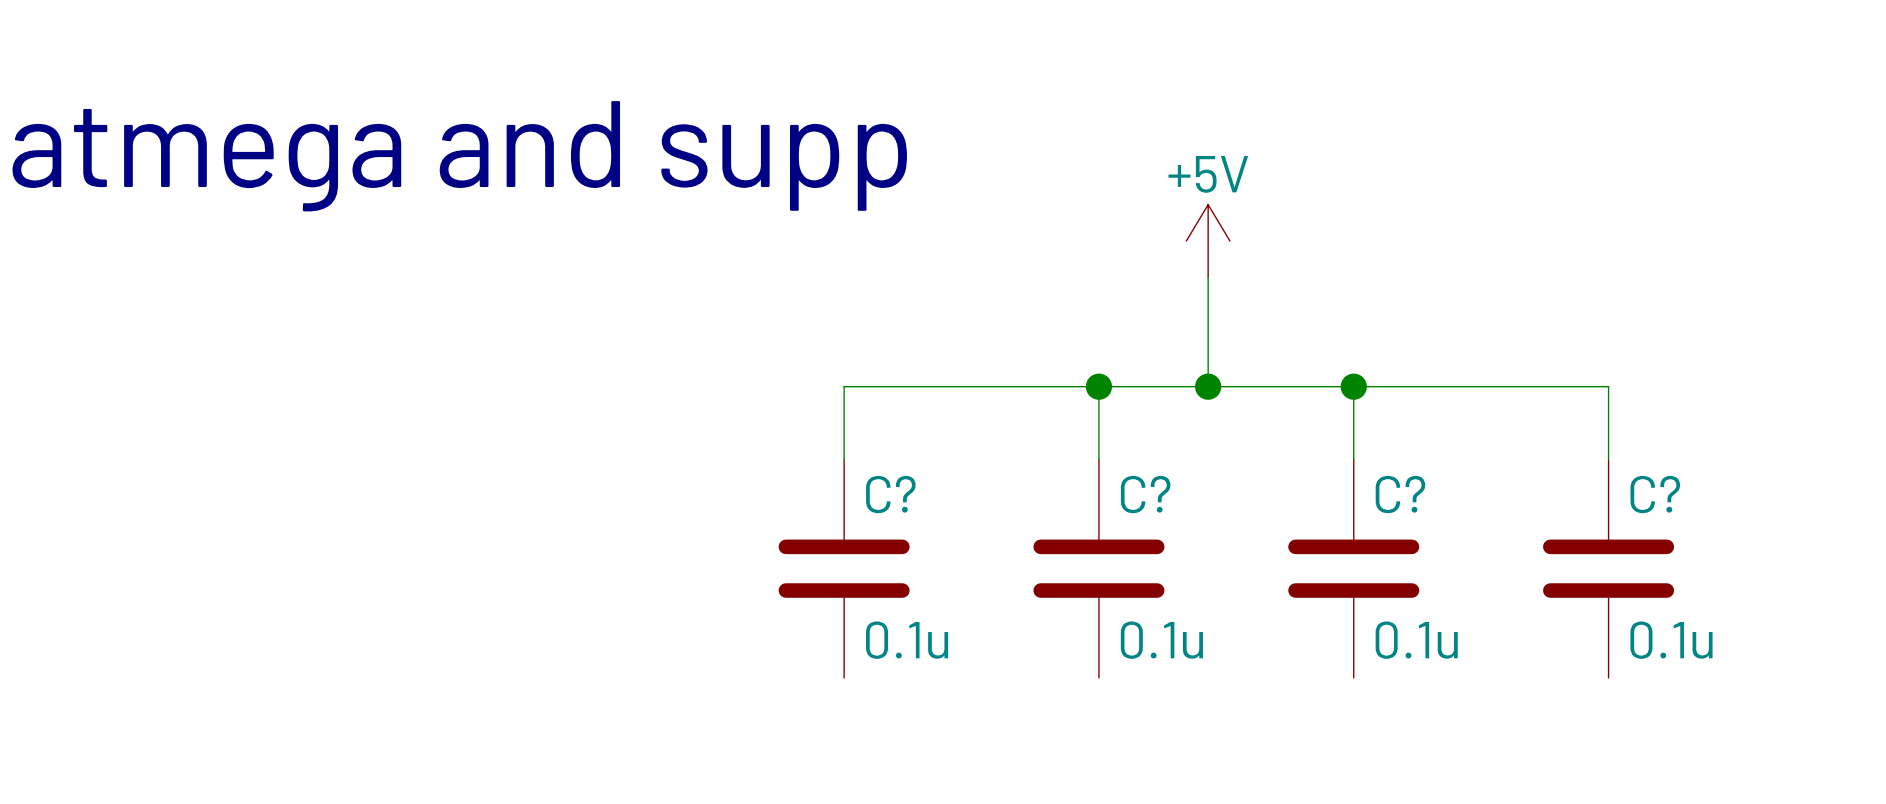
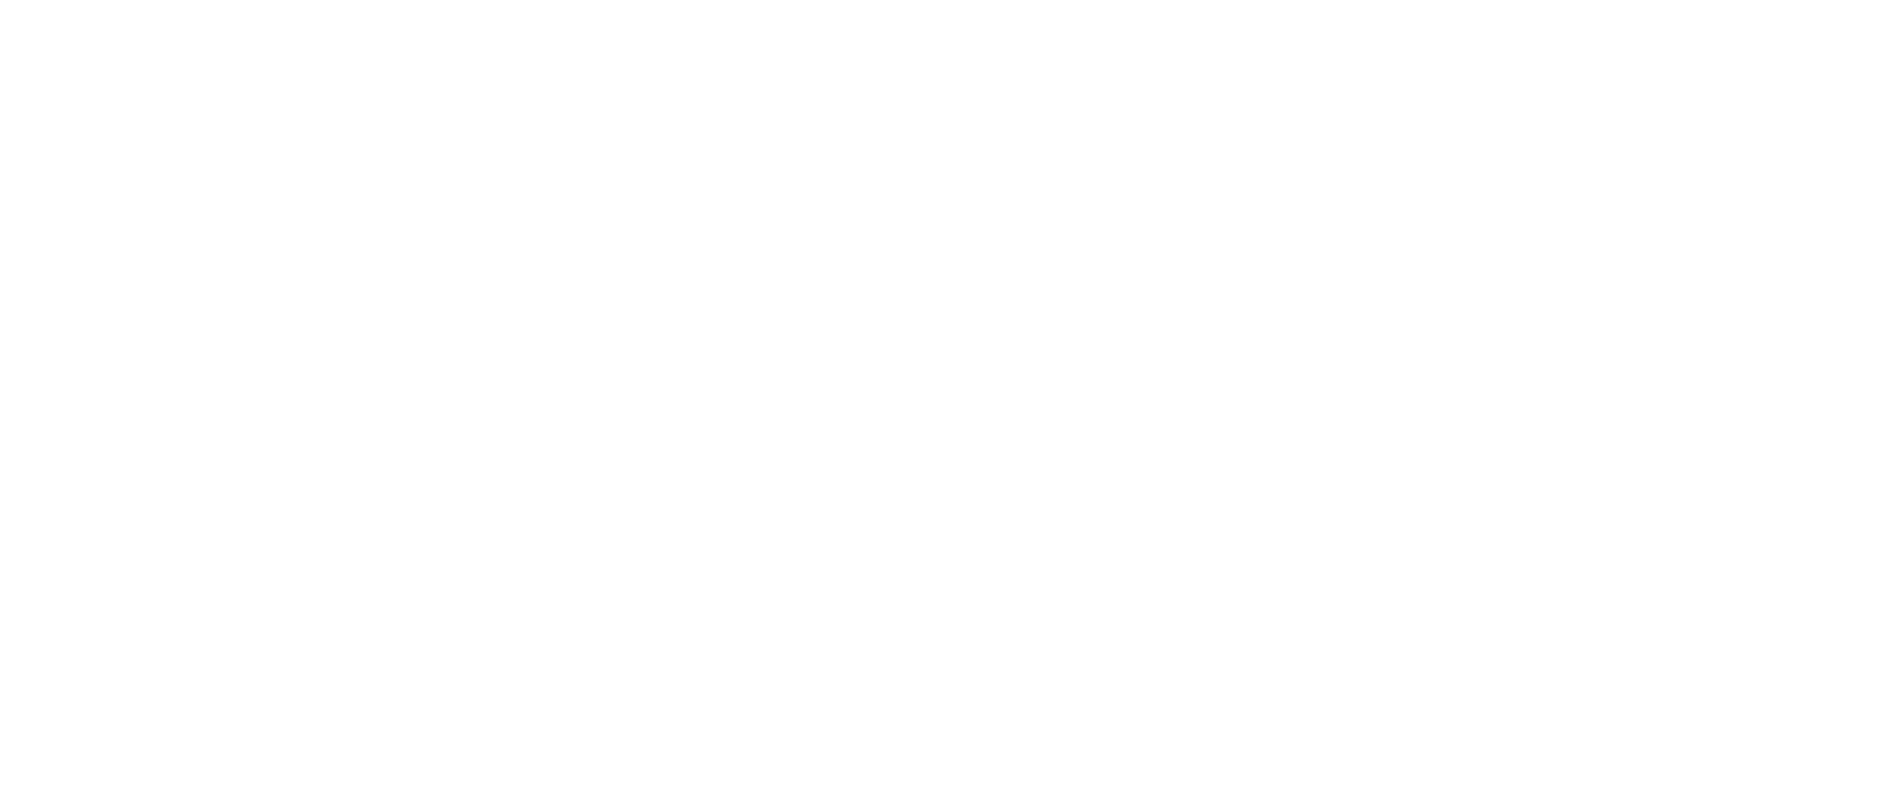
text: atmega and supp (459, 156) -> none
power symbol: +5V (1208, 241) -> none
wire: (1208, 277) (1208, 386) -> none
wire: (1098, 386) (1098, 459) -> none
junction: (1098, 386) -> none
junction: (1208, 386) -> none
wire: (1353, 386) (1353, 459) -> none
junction: (1353, 386) -> none
wire: (844, 459) (844, 386) (1608, 386) (1608, 459) -> none
C?: 0.1u (844, 568) -> none
C?: 0.1u (1098, 568) -> none
C?: 0.1u (1353, 568) -> none
C?: 0.1u (1608, 568) -> none

